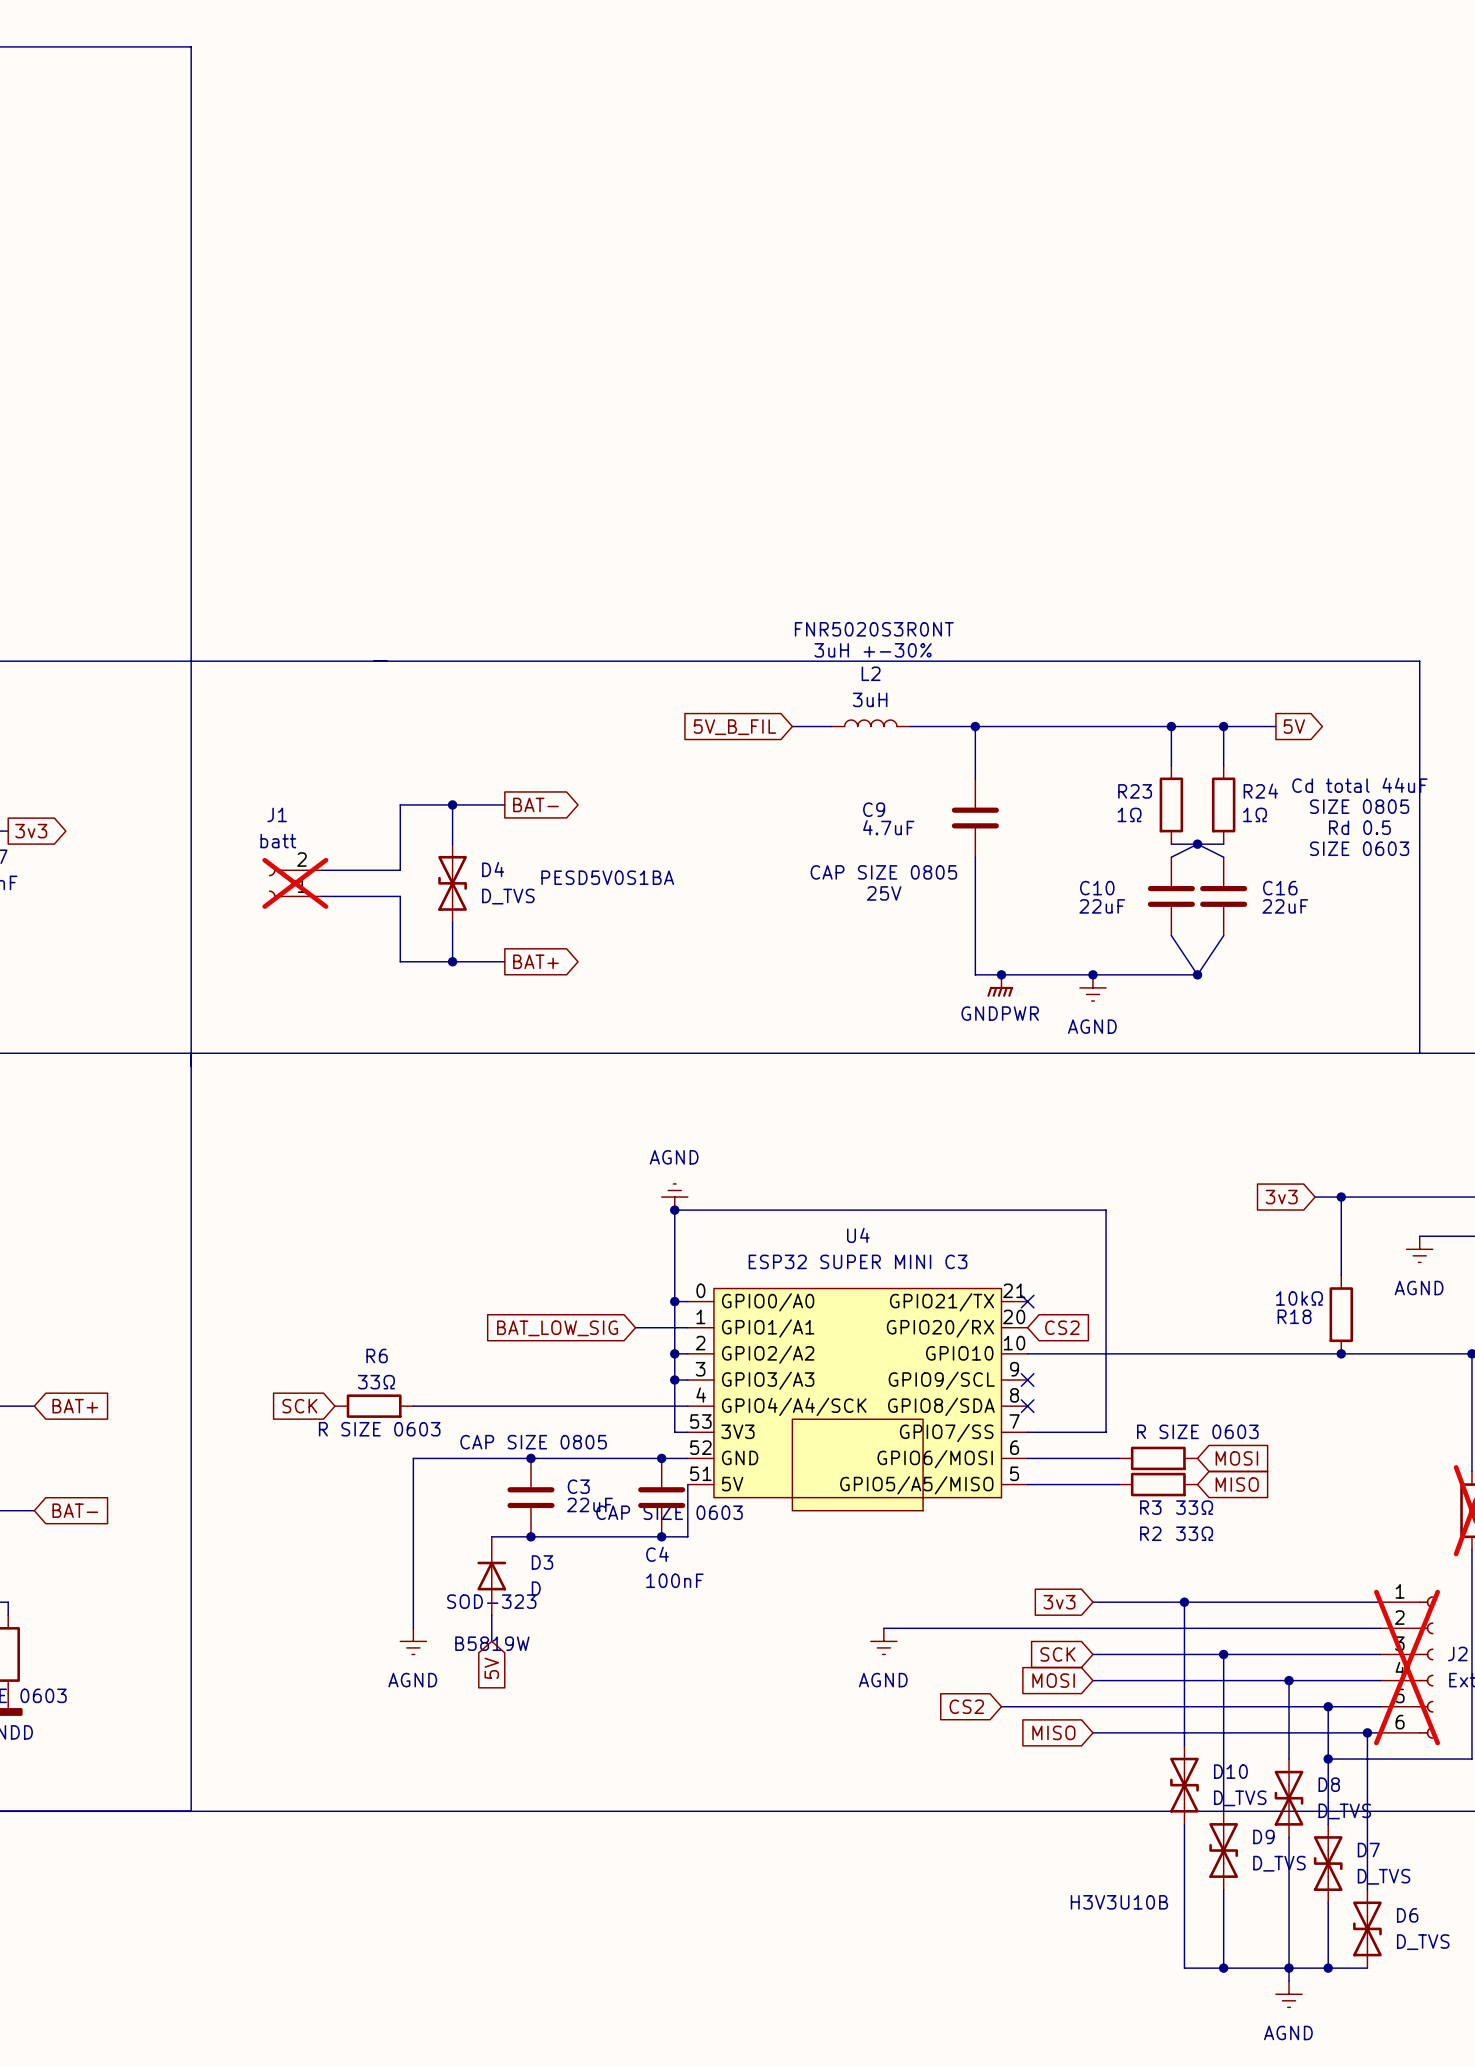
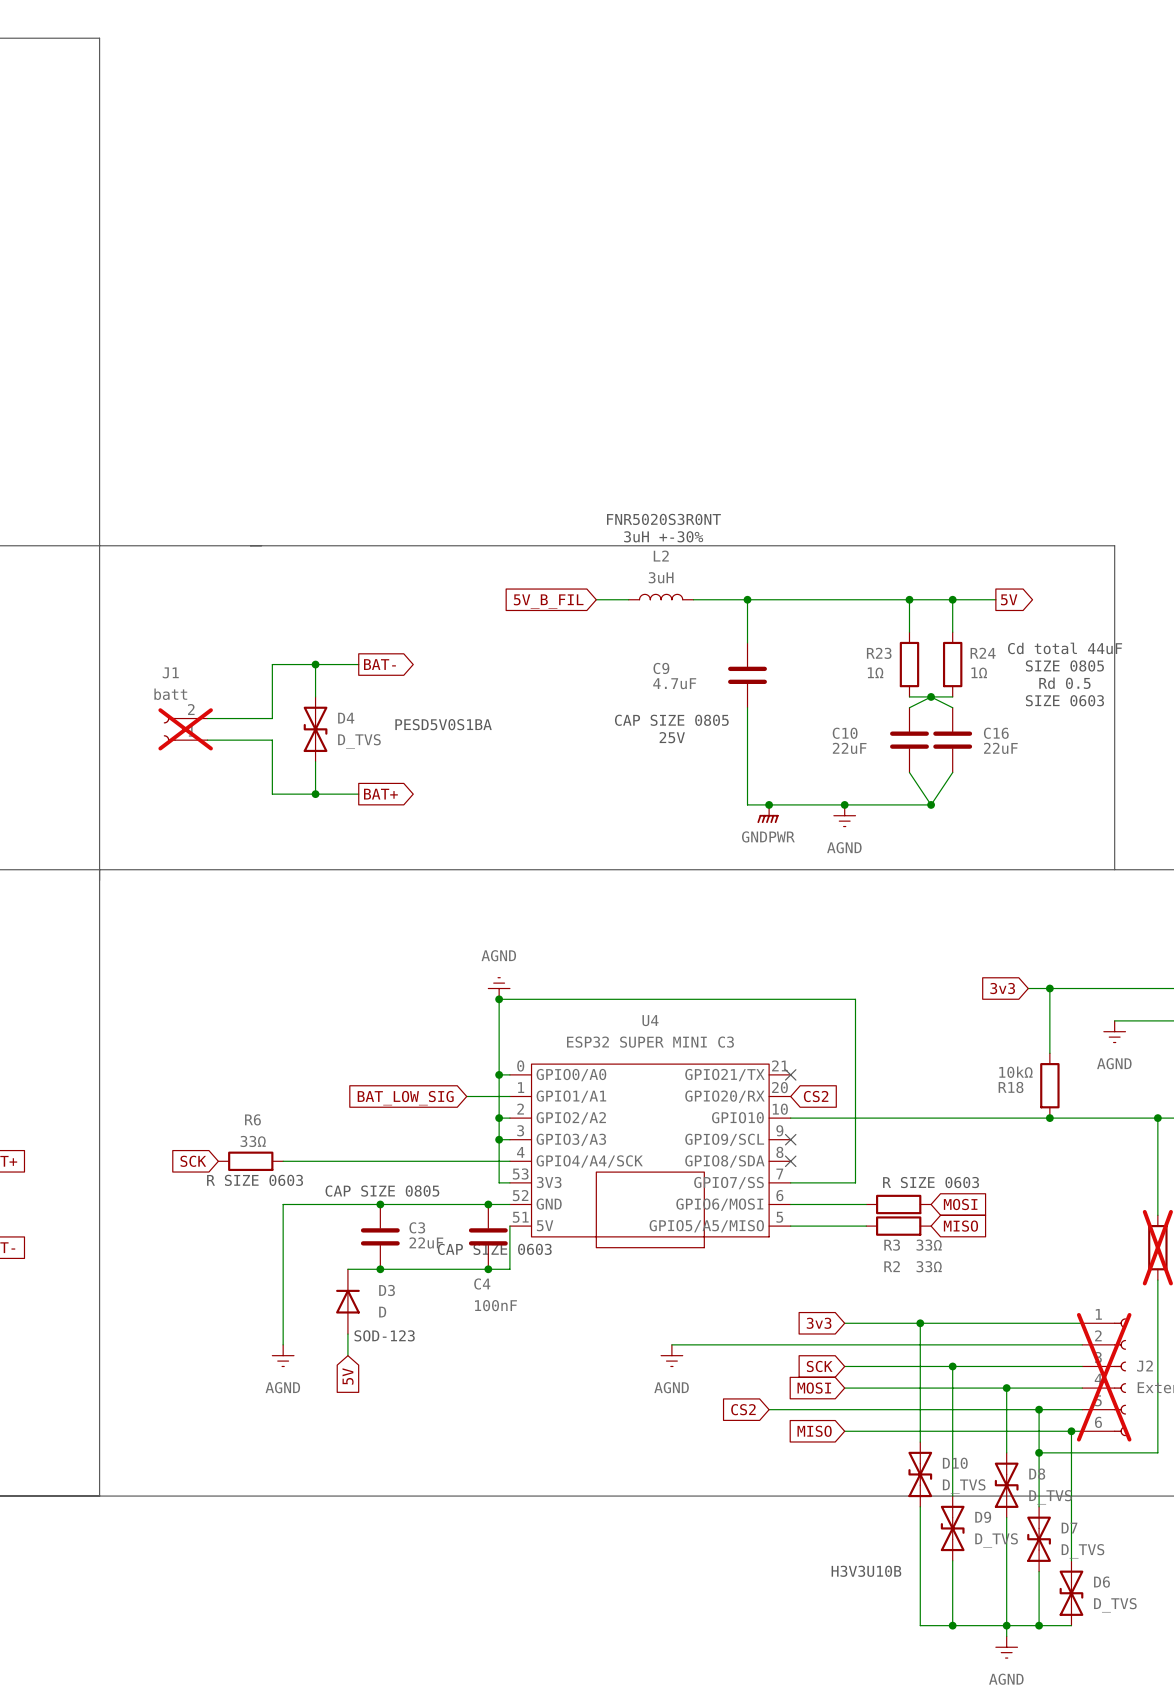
text: SOD-323 (491, 1601) -> SOD-123 (384, 1335)
text: B5819W (492, 1643) -> none

